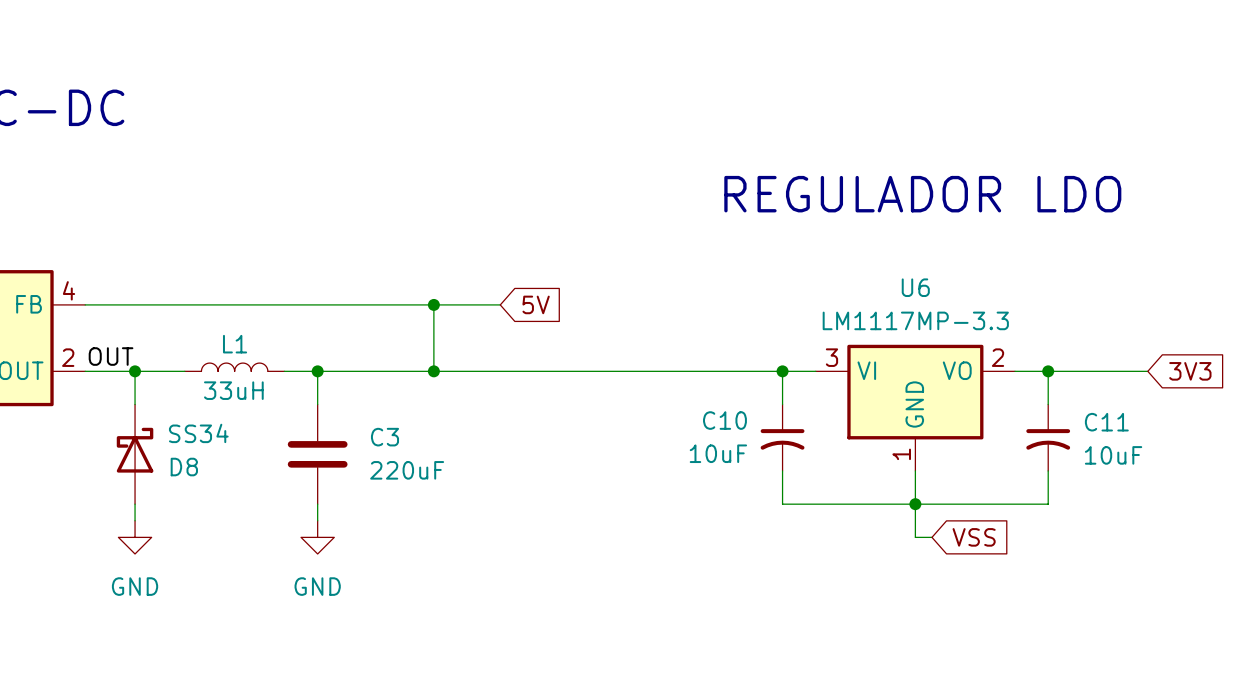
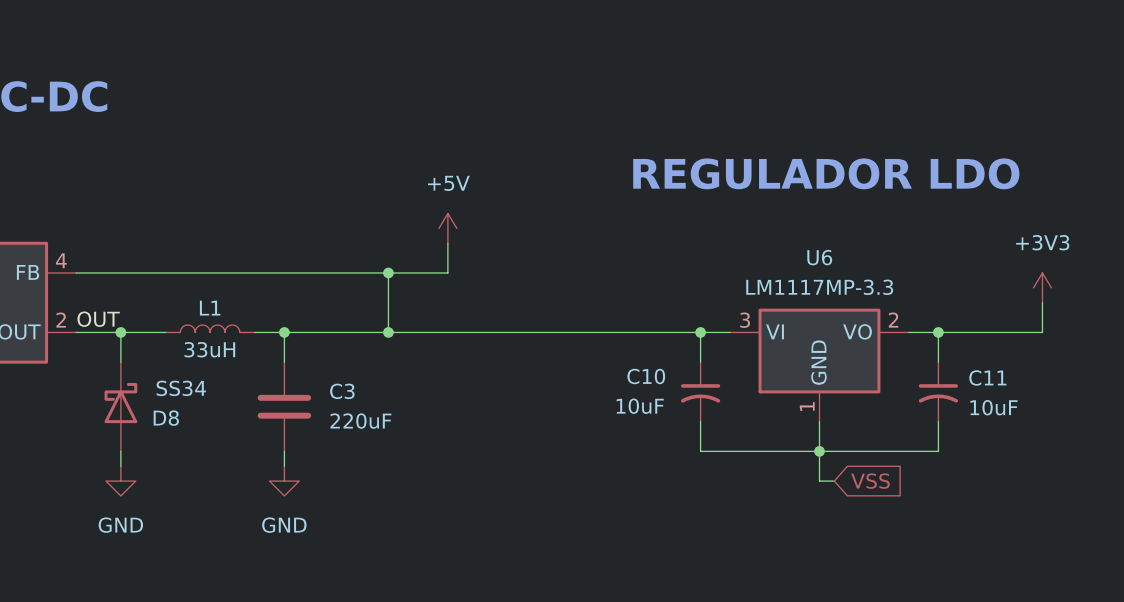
power symbol: none -> +5V (447, 228)
wire: none -> (447, 243) (447, 272)
global label: 5V (536, 304) -> none
power symbol: none -> +3V3 (1042, 287)
wire: none -> (1042, 302) (1042, 332) (1027, 332)
global label: 3V3 (1190, 371) -> none

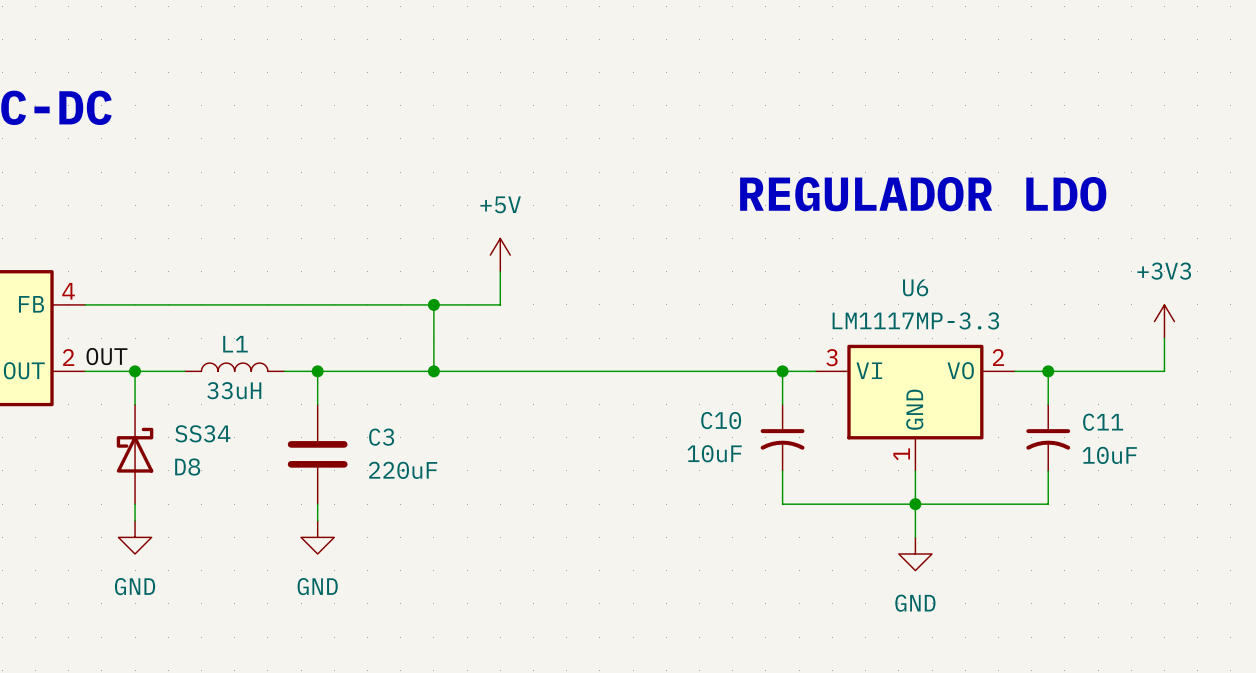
wire: (819, 481) (834, 481) -> none
global label: VSS (870, 481) -> none
power symbol: none -> GND (915, 553)

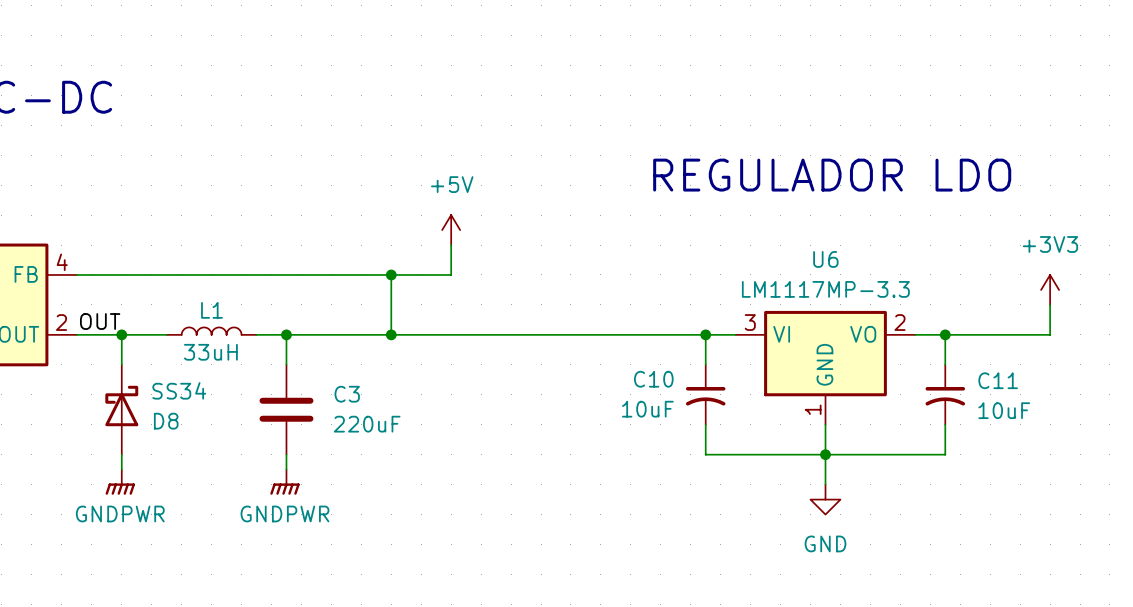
power symbol: GND (135, 537) -> GNDPWR (120, 482)
power symbol: GND (317, 537) -> GNDPWR (284, 482)

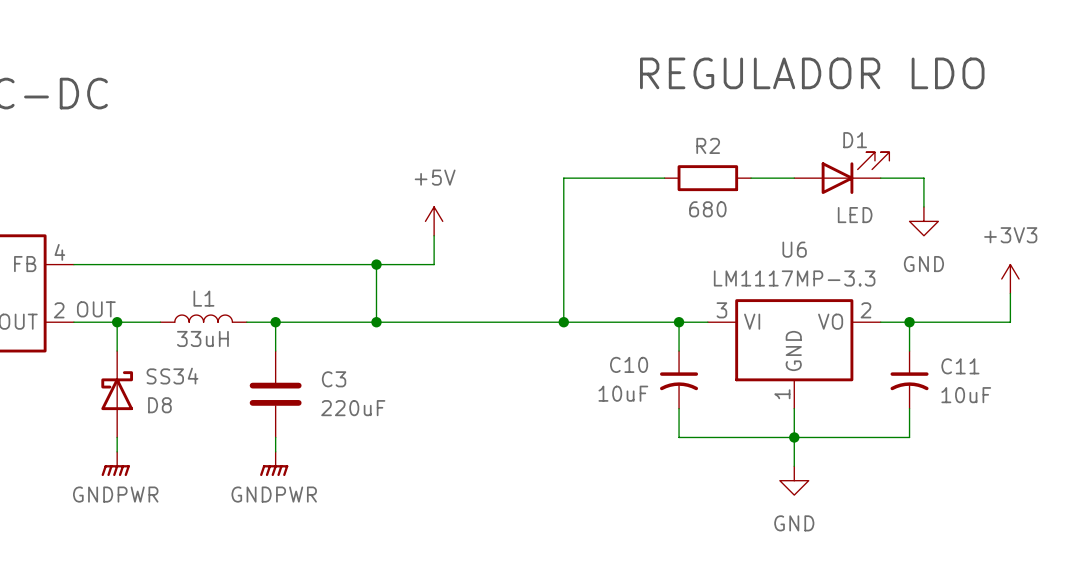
text position: REGULADOR LDO (832, 175) -> REGULADOR LDO (812, 73)
D1: none -> LED (841, 173)
wire: none -> (664, 178) (563, 178) (563, 322)
R2: none -> 680 (707, 178)
wire: none -> (751, 178) (794, 178)
wire: none -> (880, 178) (923, 178) (923, 206)
power symbol: none -> GND (923, 221)
junction: none -> (563, 322)

